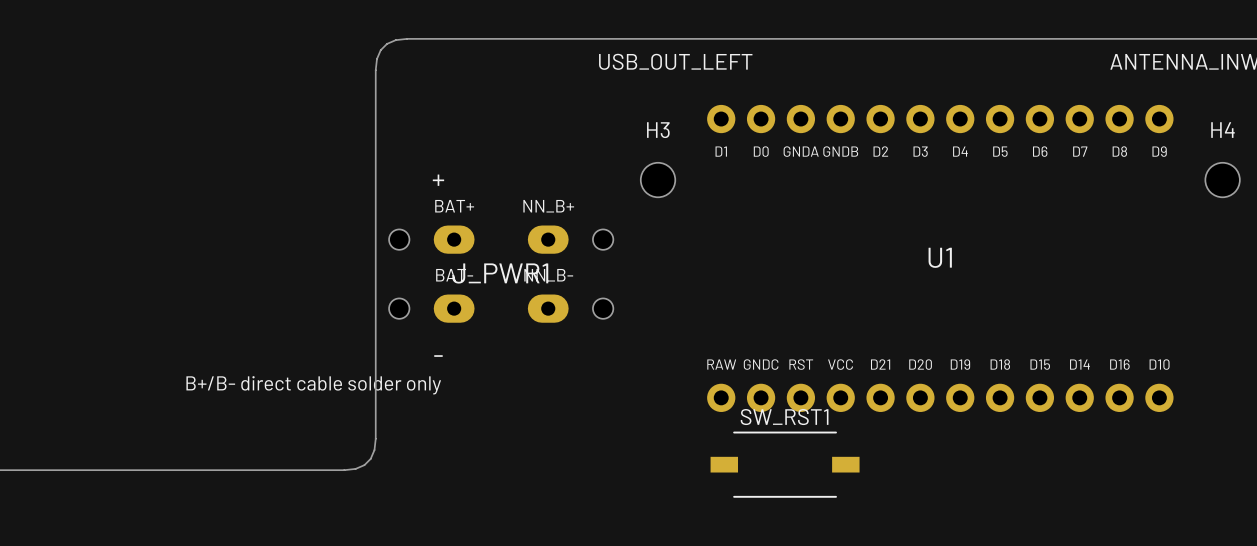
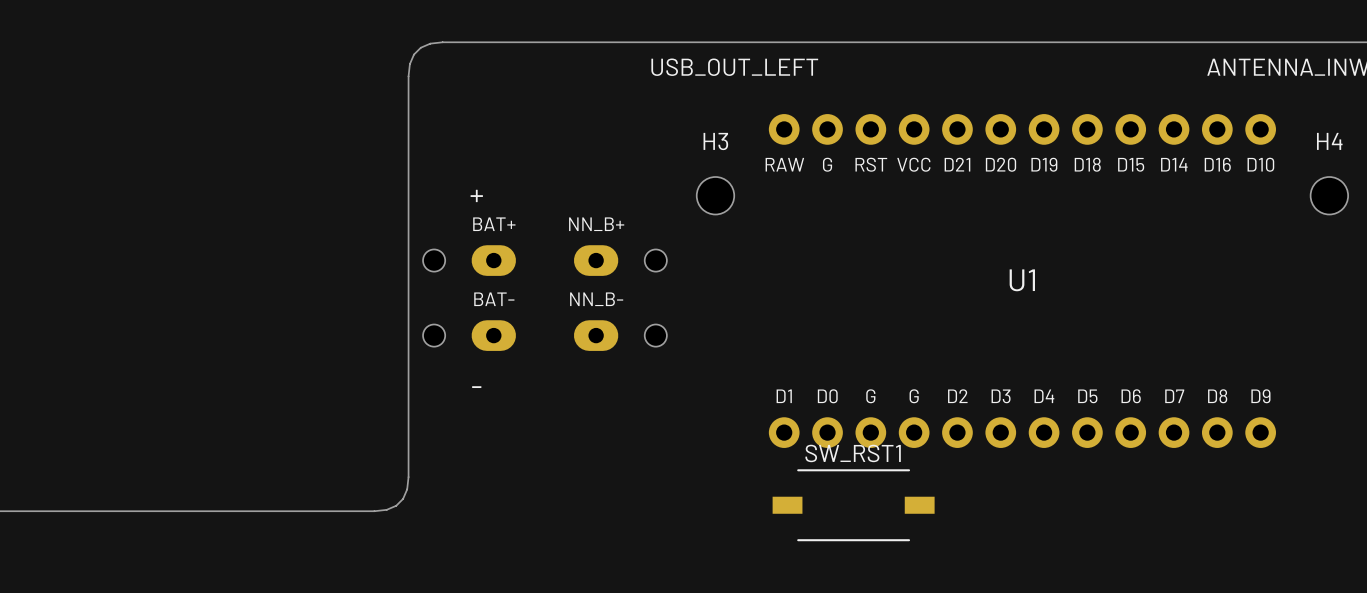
U1 footprint: [707, 104, 1174, 412] -> [768, 114, 1276, 448]
J_PWR1 name: J_PWR1 (500, 273) -> none
text: B+/B- direct cable solder only (313, 385) -> none

